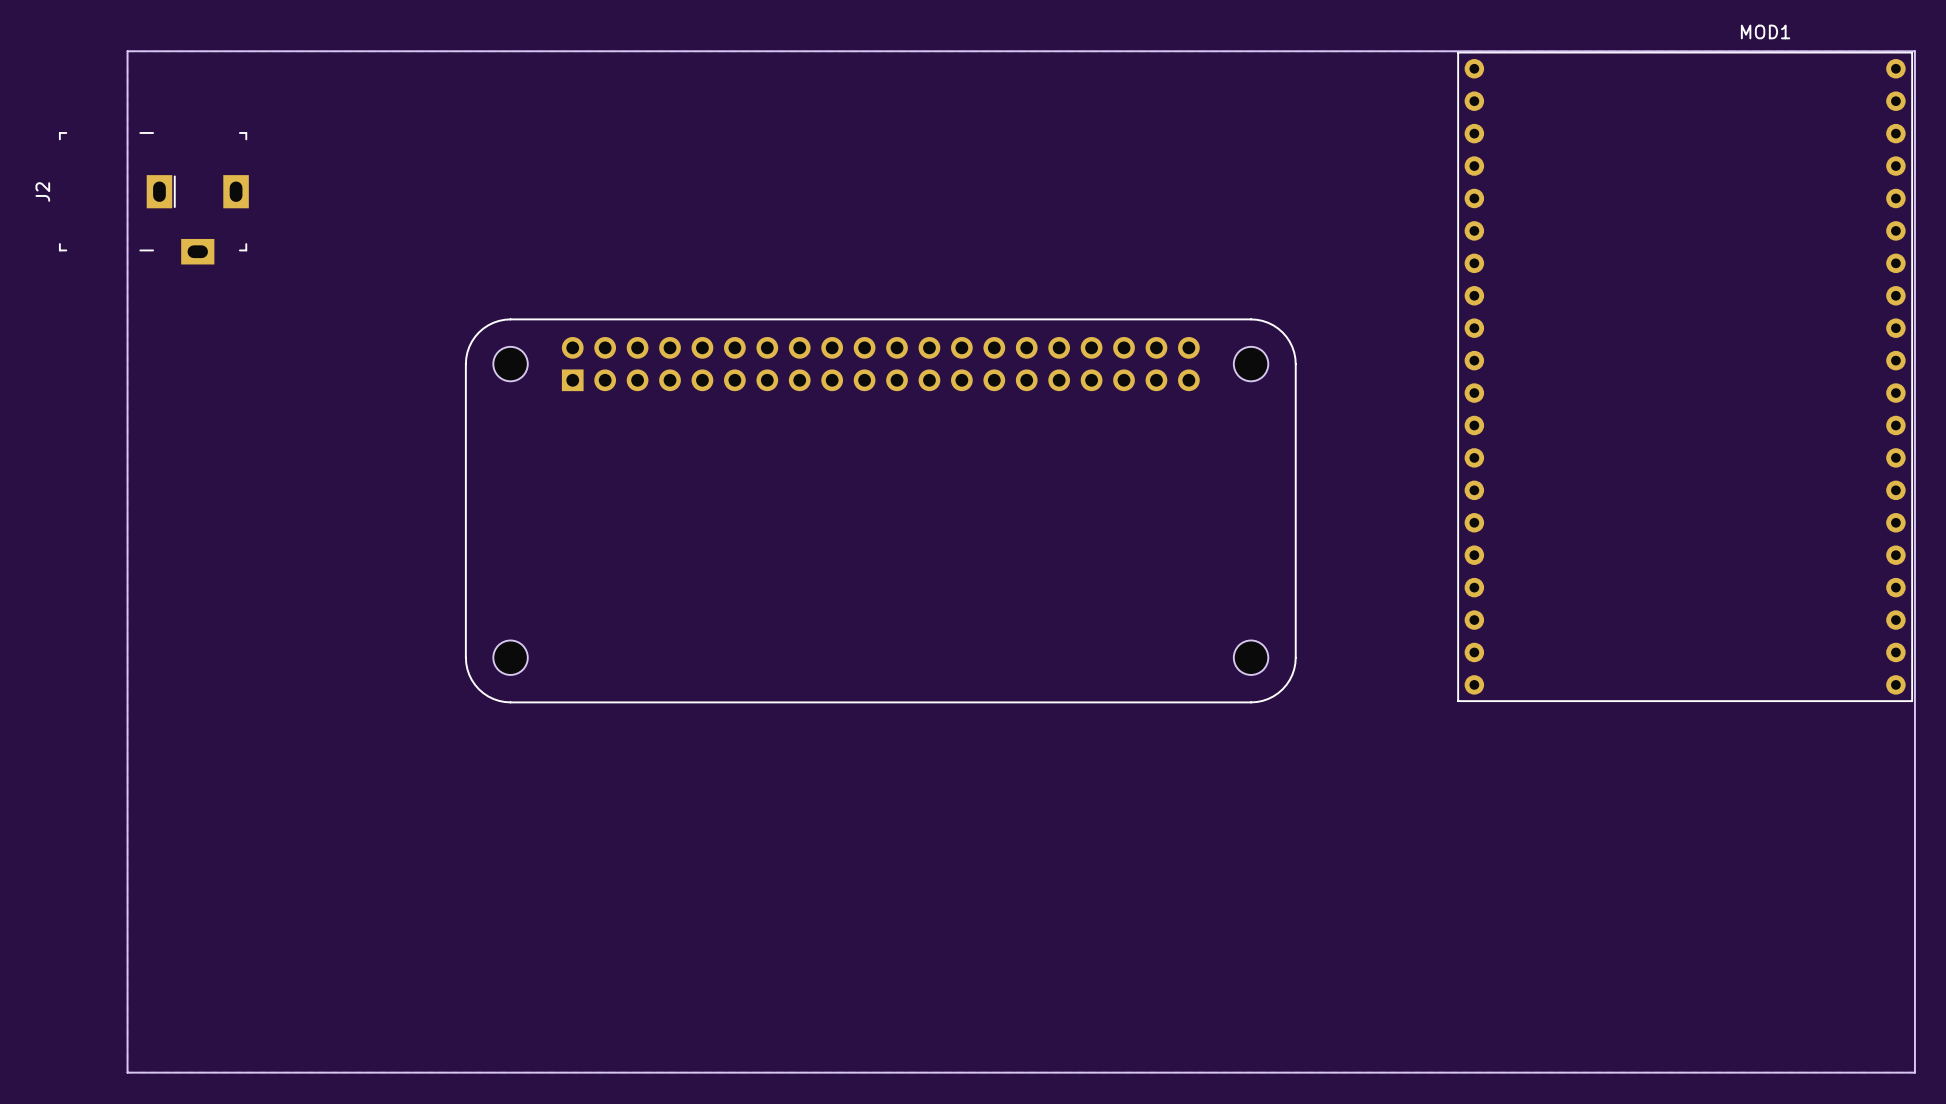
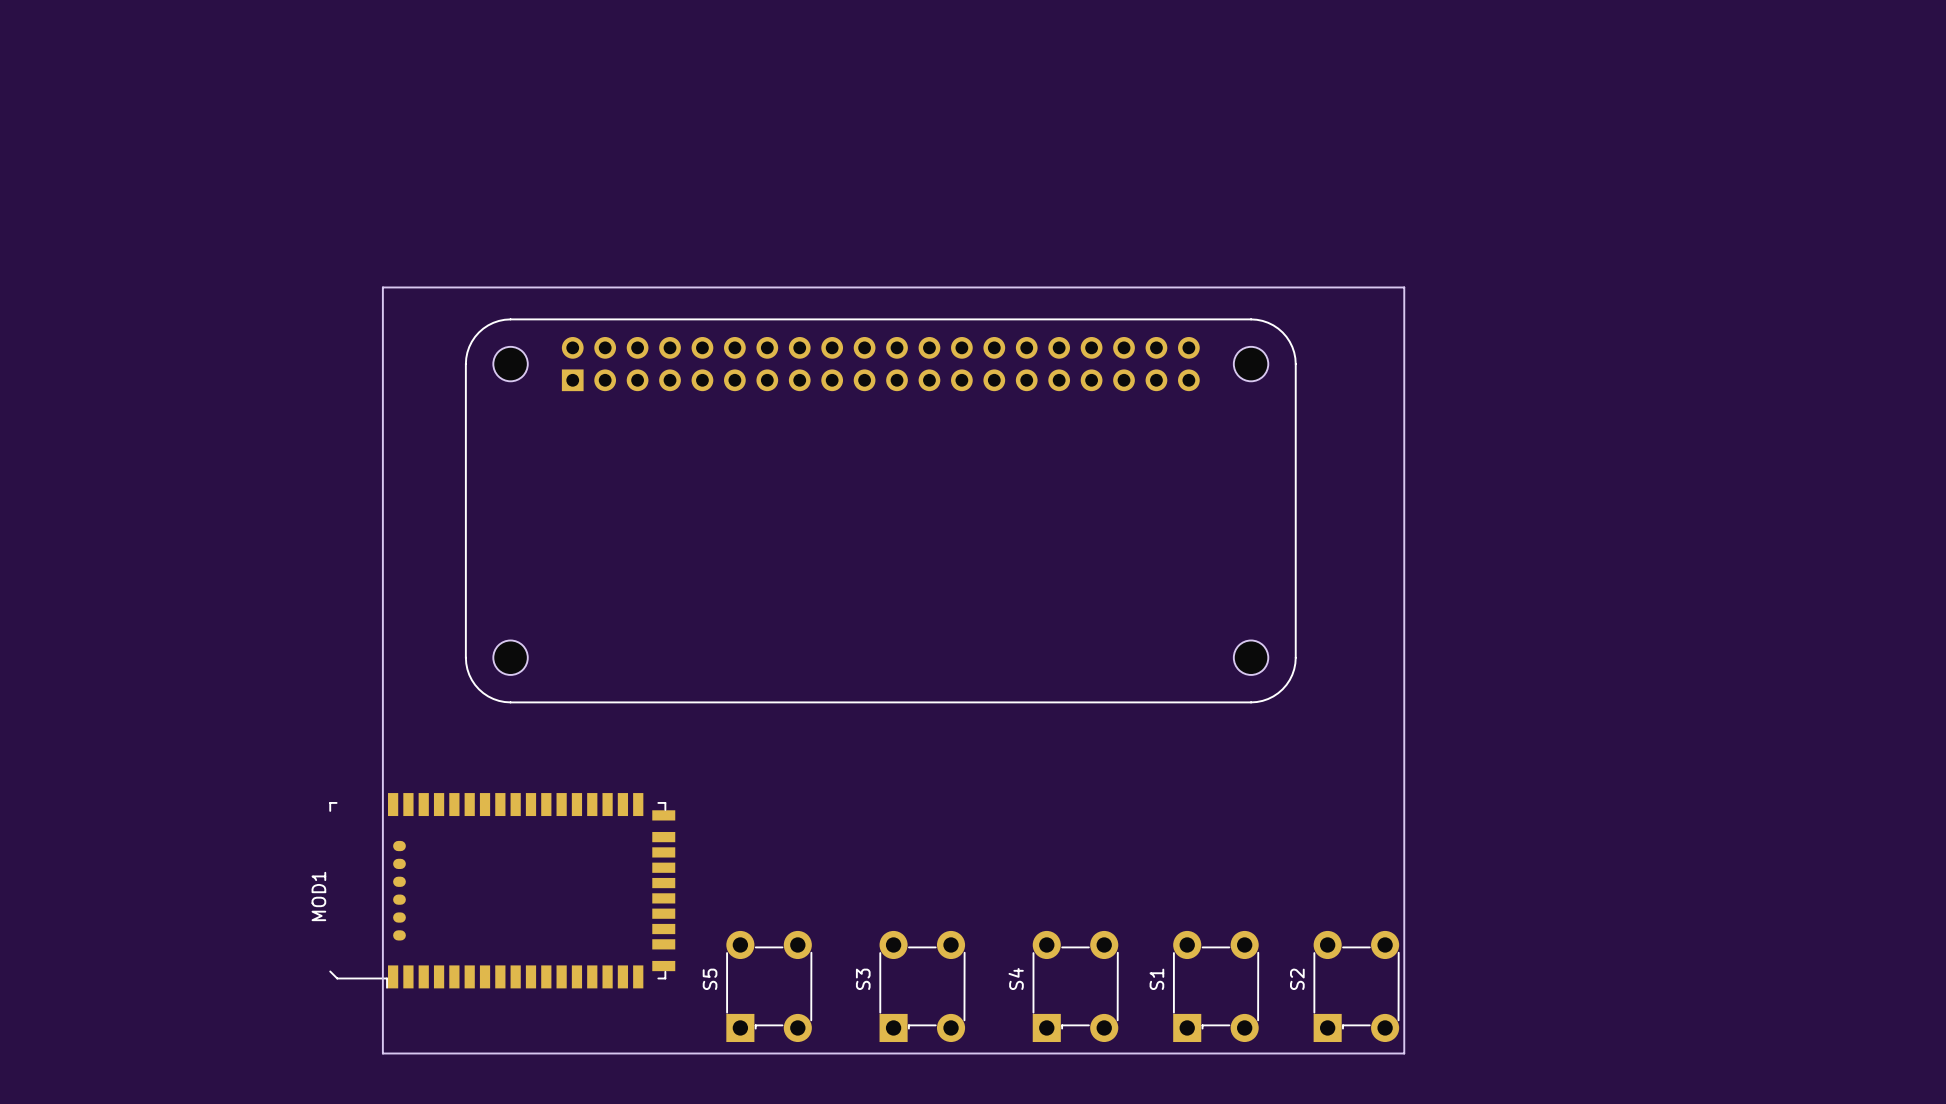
MOD1 name position: MOD1 (1765, 31) -> MOD1 (318, 896)
board edge: (127, 51) (127, 1072) (1914, 1072) (1914, 51) (127, 51) -> none
MOD1 footprint: [1457, 51, 1913, 702] -> [329, 793, 676, 989]
J2: (154, 198) -> none
board edge: none -> (382, 287) (382, 1053) (1404, 1053) (1404, 287) (382, 287)
S5: none -> (769, 986)
S3: none -> (922, 986)
S4: none -> (1075, 986)
S1: none -> (1216, 986)
S2: none -> (1356, 986)

